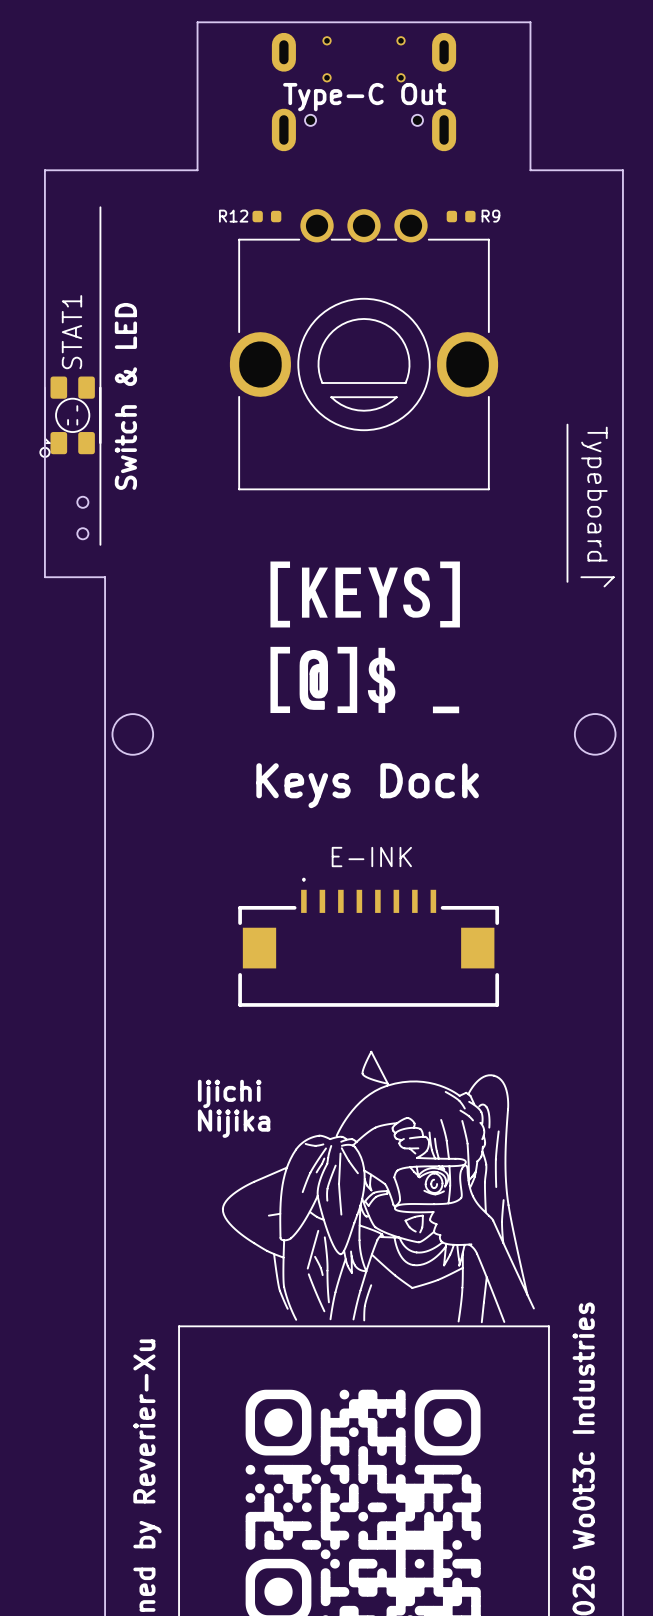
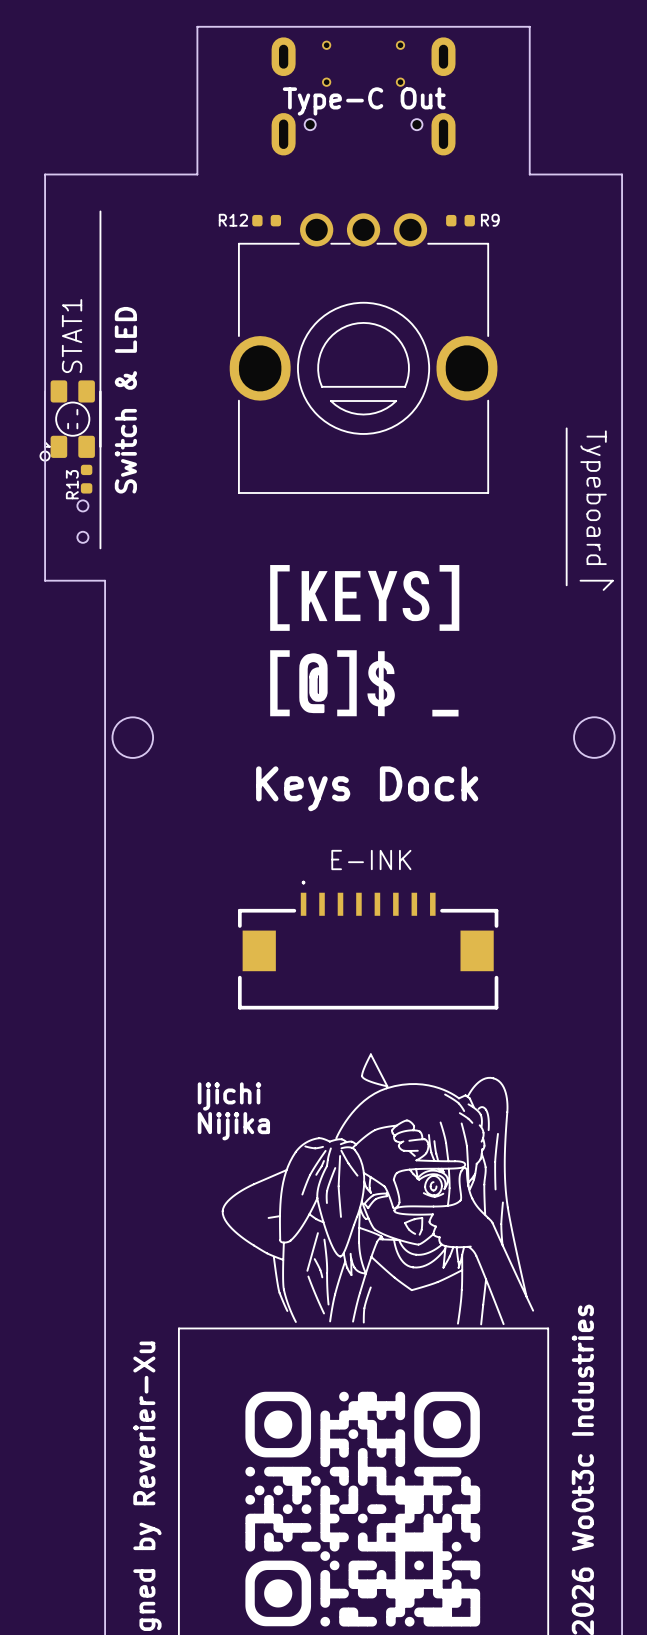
R13: none -> (86, 479)

